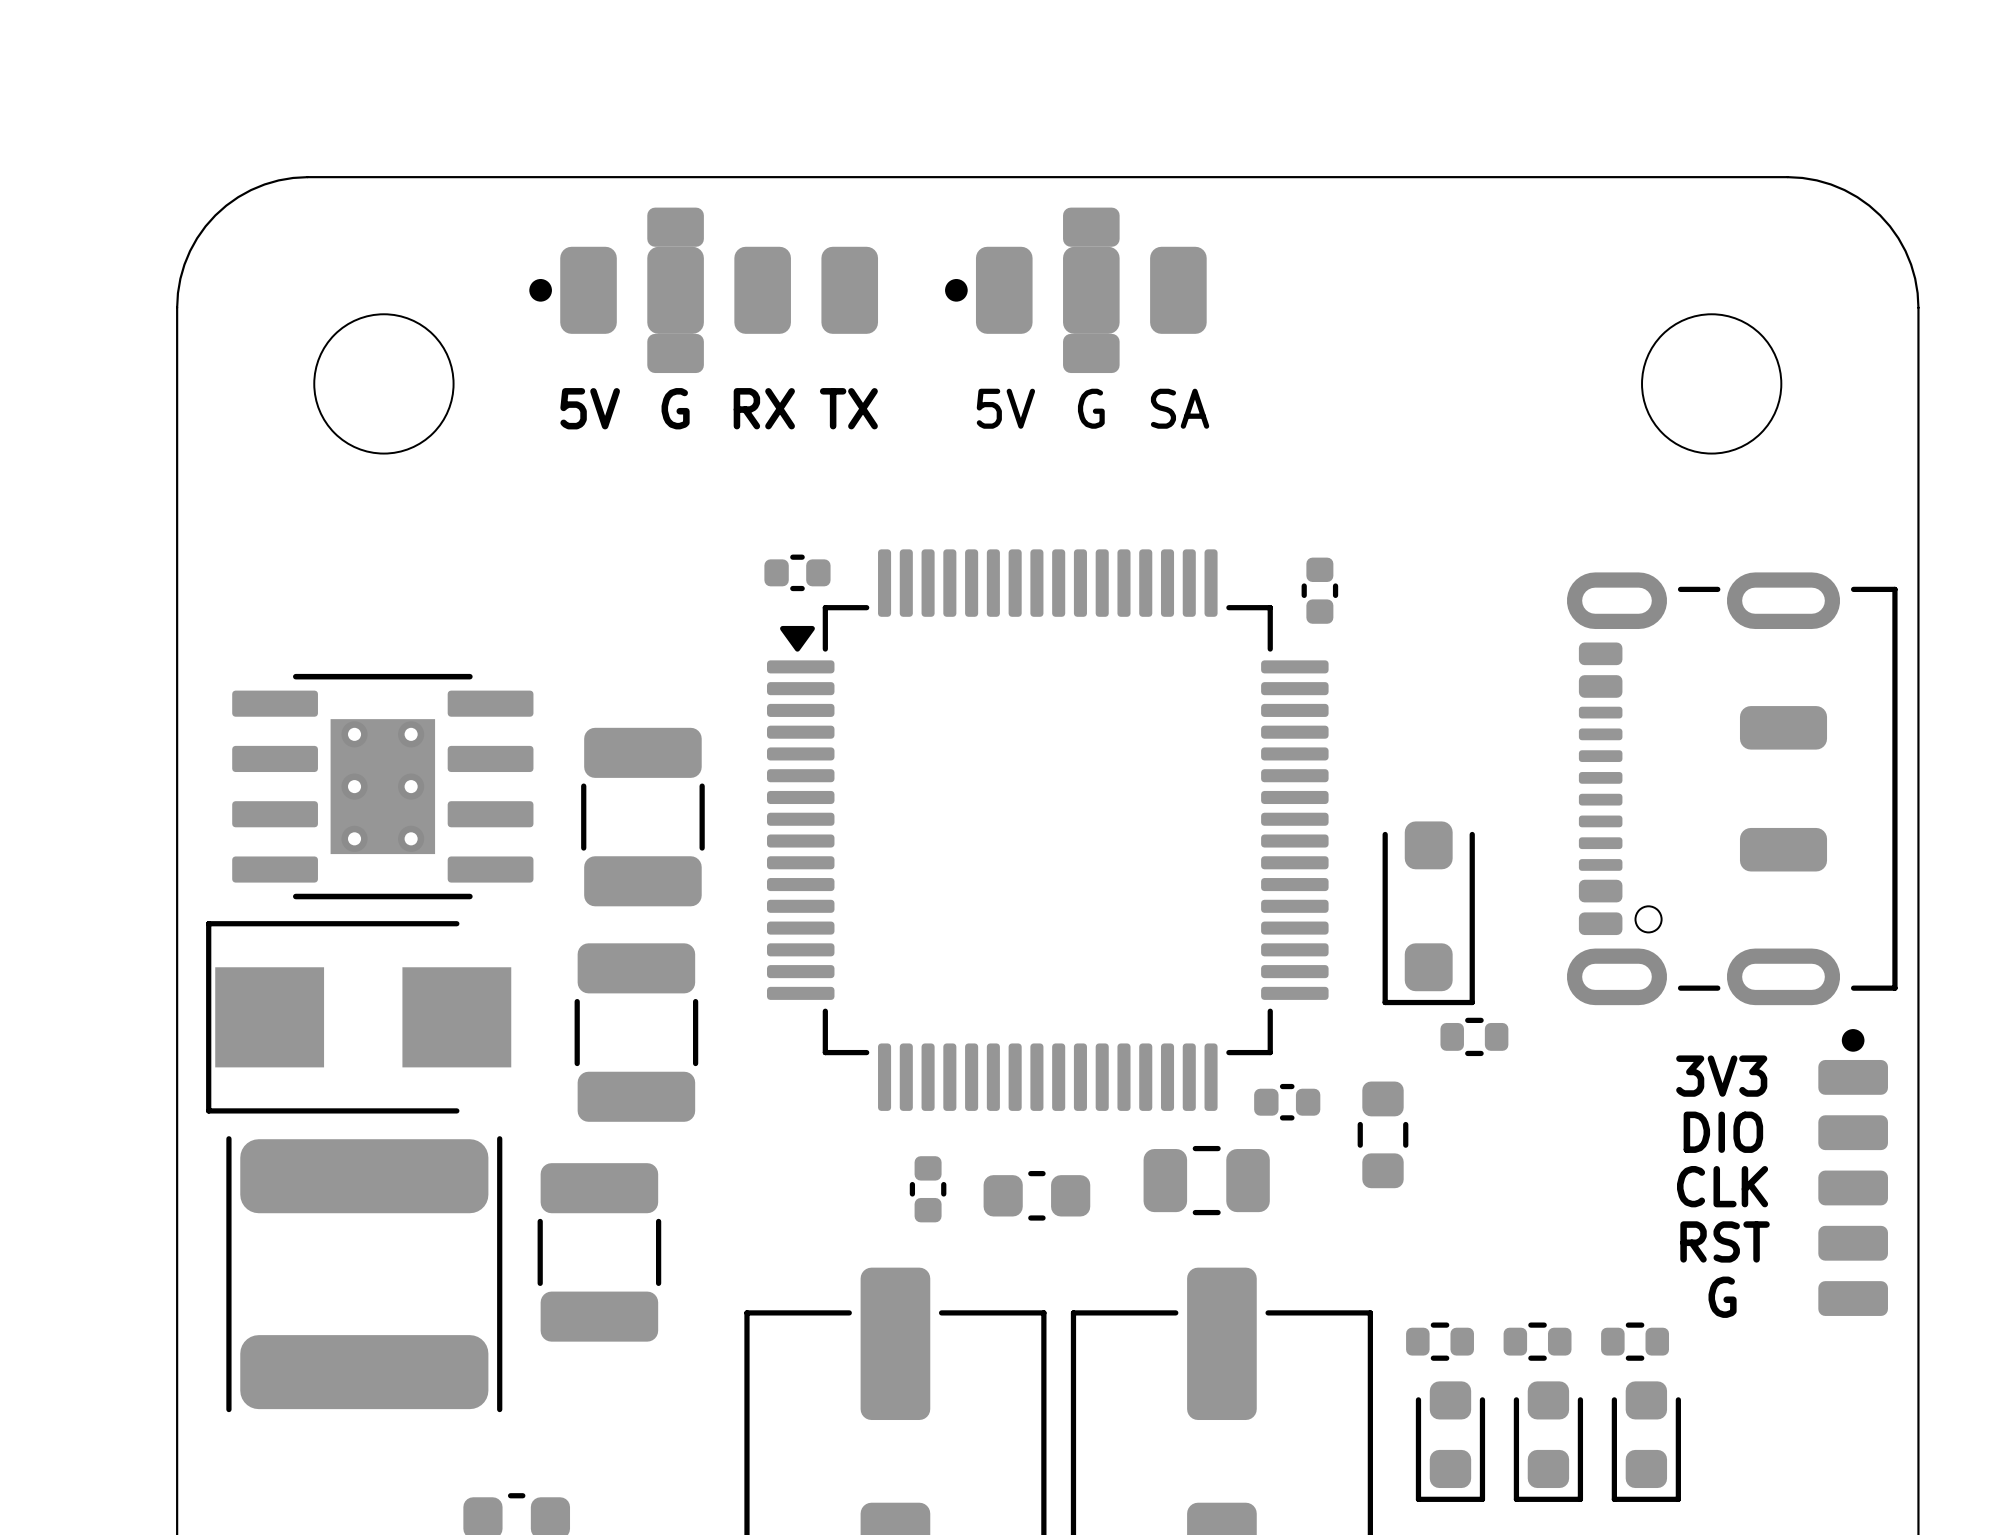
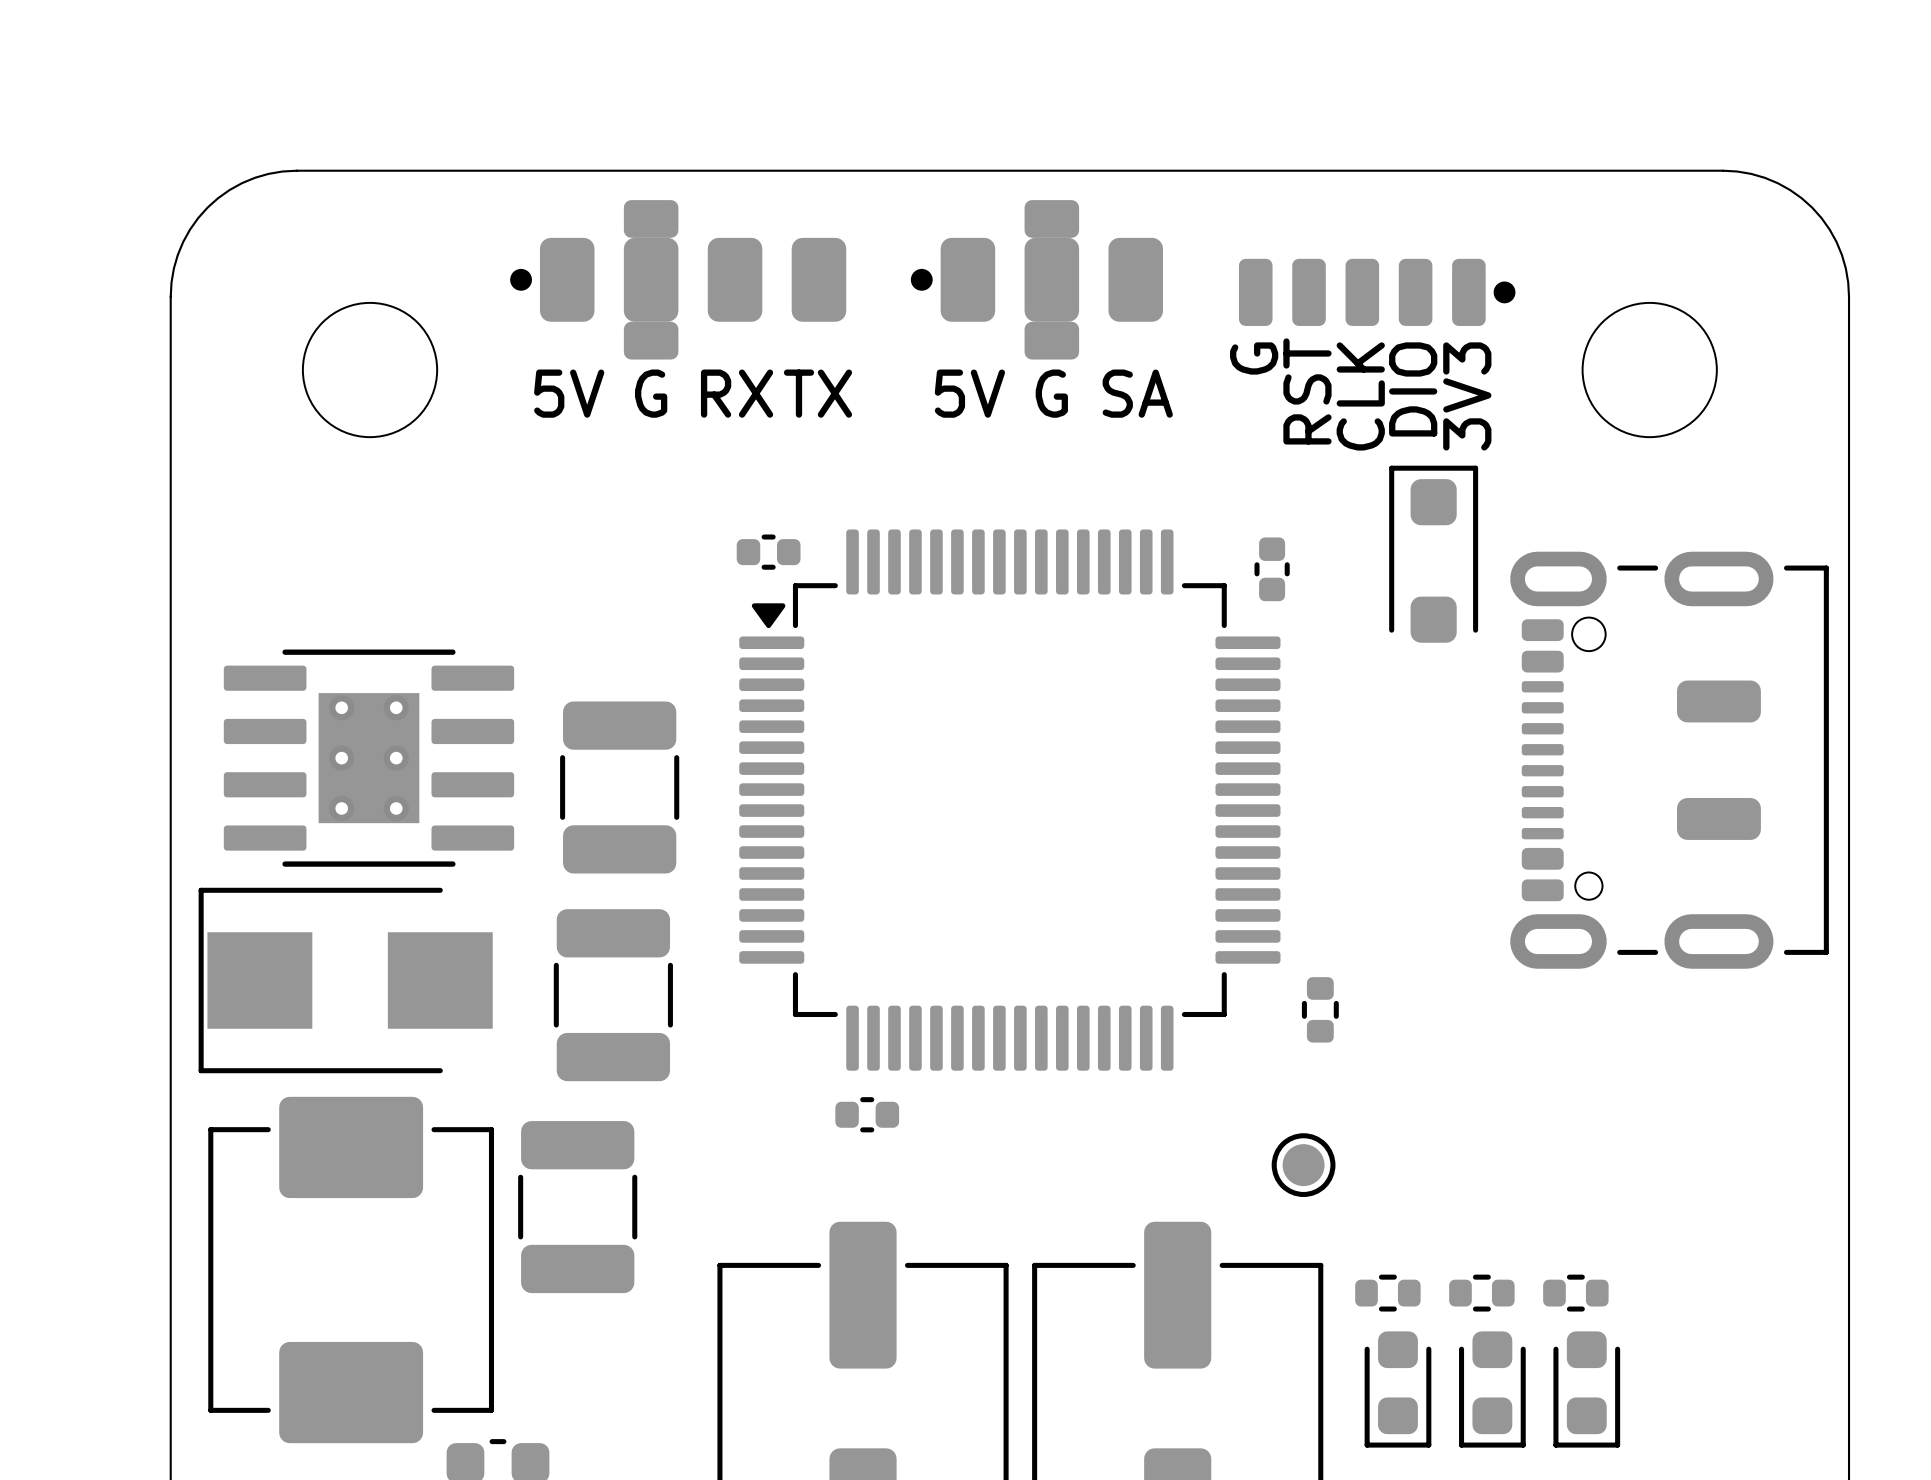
part footprint: [529, 207, 879, 374] -> [510, 200, 847, 360]
part footprint: [945, 207, 1207, 374] -> [910, 200, 1164, 360]
part: none -> (1377, 292)
part footprint: [1566, 572, 1898, 1006] -> [1510, 551, 1829, 969]
part rotation: 0° (1428, 913) -> 180° (1433, 554)
part position: (1428, 913) -> (1433, 554)
part rotation: 0° (1474, 1036) -> 90° clockwise (1320, 1009)
part position: (1474, 1036) -> (1320, 1009)
part: (1287, 1102) -> none
part: (1383, 1134) -> none
part footprint: [226, 1136, 503, 1413] -> [208, 1096, 495, 1444]
part: (1853, 1172) -> none
part: (1206, 1180) -> none
part rotation: 0° (928, 1189) -> 90° clockwise (867, 1114)
part position: (928, 1189) -> (867, 1114)
part: (1036, 1195) -> none
part: none -> (1303, 1165)

